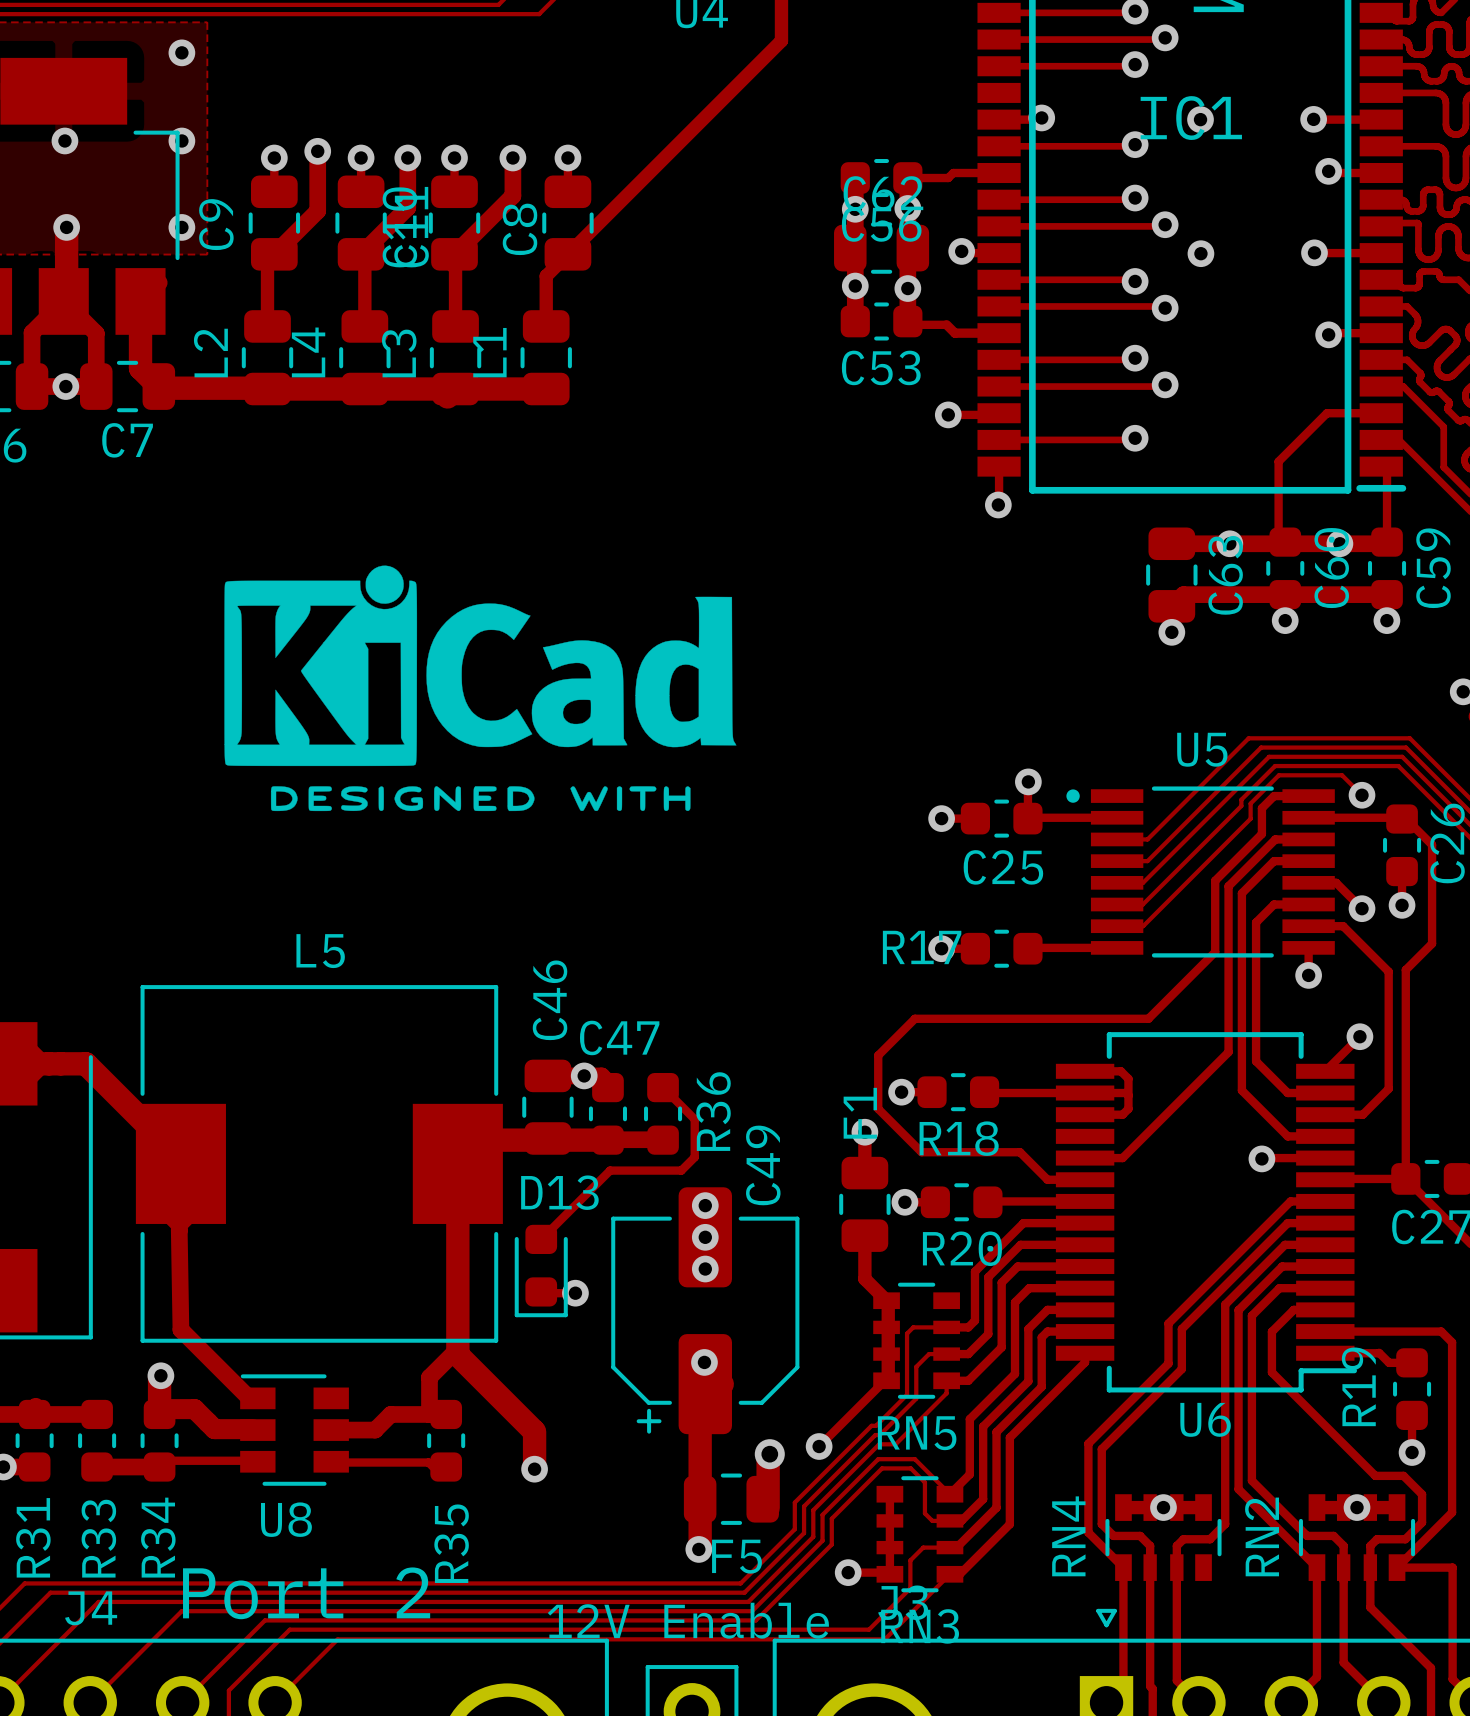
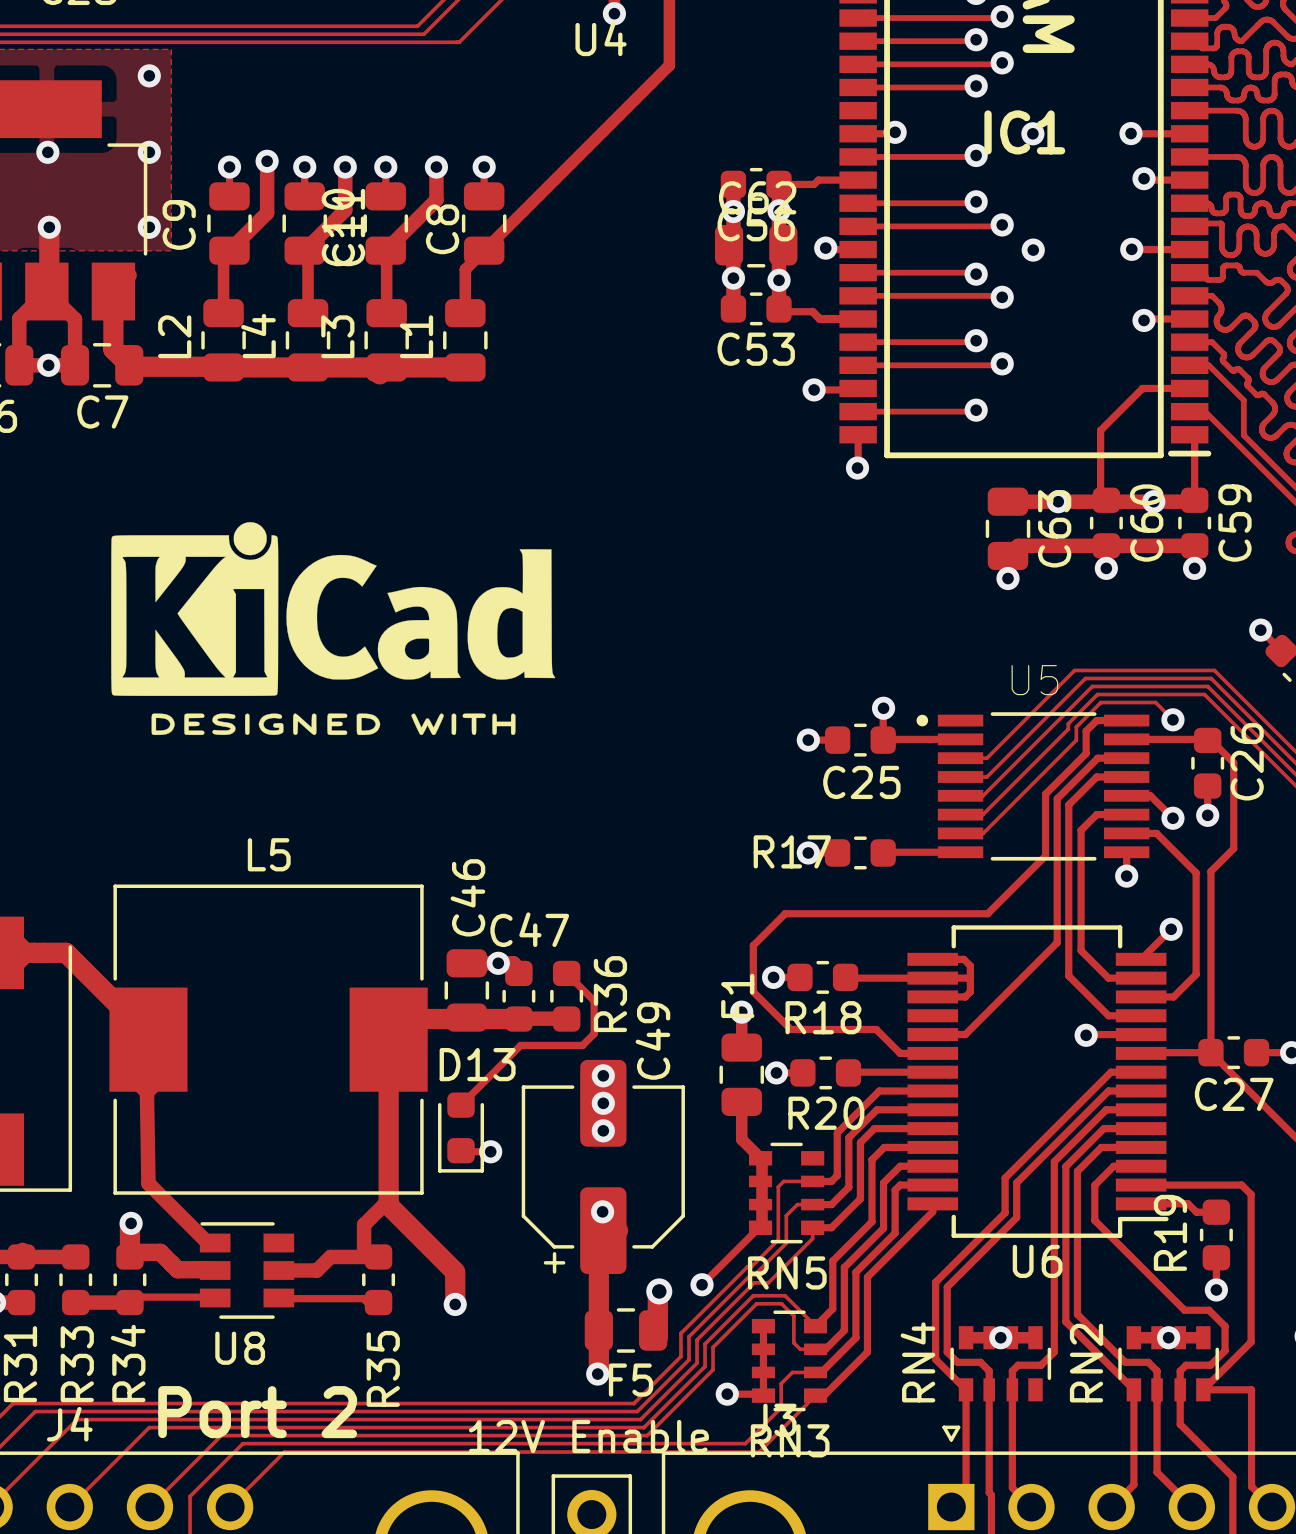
drawing position: (480, 688) -> (333, 628)

